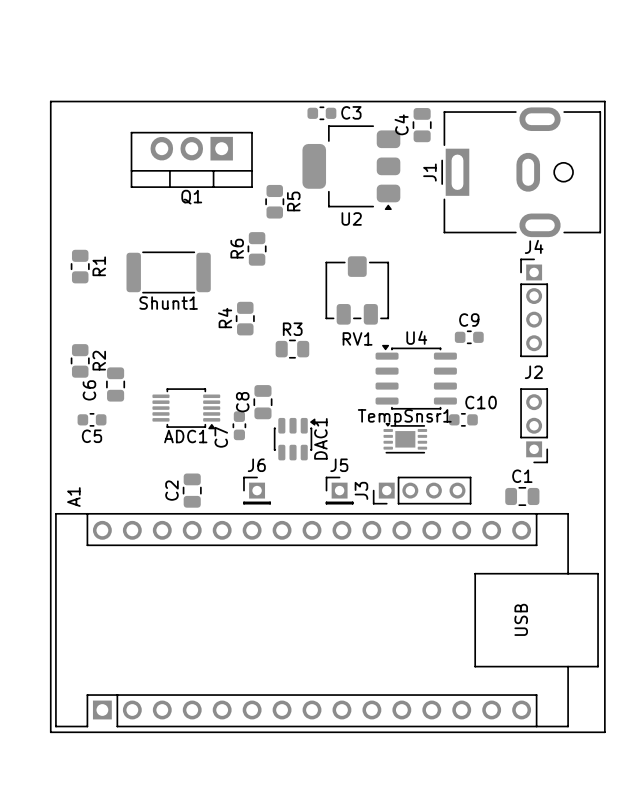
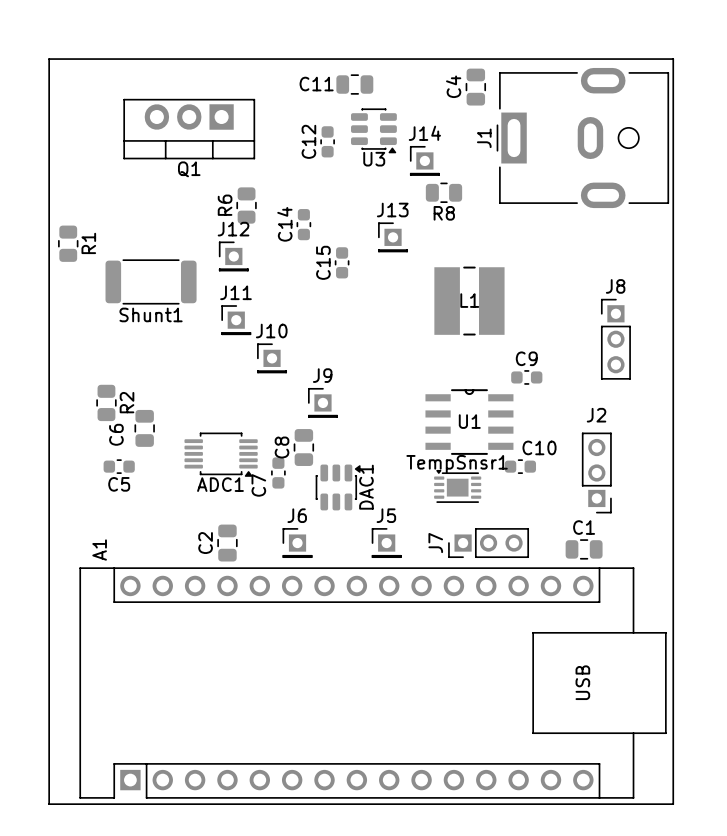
C11: none -> (354, 84)
board edge: (604, 101) (50, 101) (50, 732) -> (673, 122) (673, 59) (49, 59) (49, 804) (74, 804)
U3: none -> (373, 130)
C3: (321, 113) -> none
C12: none -> (327, 141)
C4 position: (422, 125) -> (475, 87)
J14: none -> (424, 160)
Q1 position: (191, 159) -> (189, 129)
R8: none -> (443, 192)
U2: (351, 167) -> none
J1 position: (521, 172) -> (582, 138)
C14: none -> (303, 224)
R5: (274, 201) -> none
J13: none -> (393, 237)
J12: none -> (233, 256)
C15: none -> (342, 262)
R6 position: (257, 248) -> (246, 205)
R1 position: (80, 266) -> (68, 243)
L1: none -> (469, 301)
Shunt1 position: (168, 272) -> (151, 281)
J11: none -> (236, 320)
RV1: (357, 290) -> none
J8: none -> (615, 339)
J4: (534, 307) -> none
R4: (245, 318) -> none
J10: none -> (272, 358)
R3: (292, 349) -> none
J9: none -> (322, 402)
U4: (416, 377) -> none
U1: none -> (469, 422)
J3: (422, 490) -> none
J7: none -> (488, 543)

